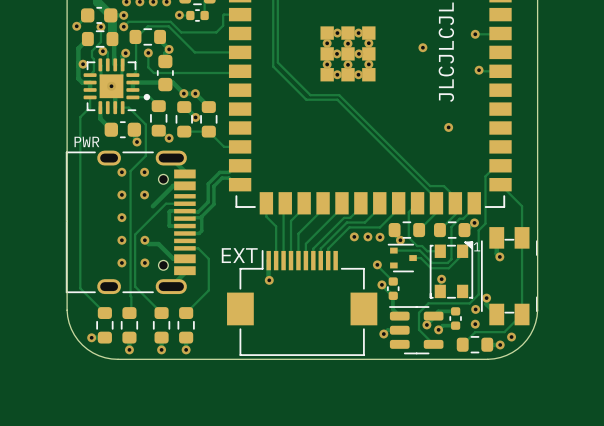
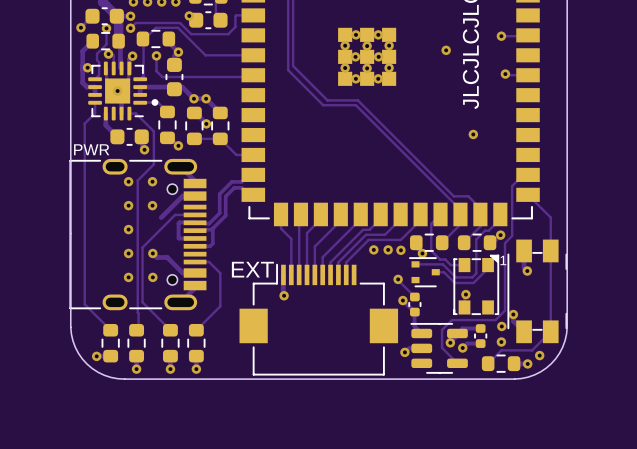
part footprint: [186, 9, 209, 22] -> [189, 11, 228, 30]

